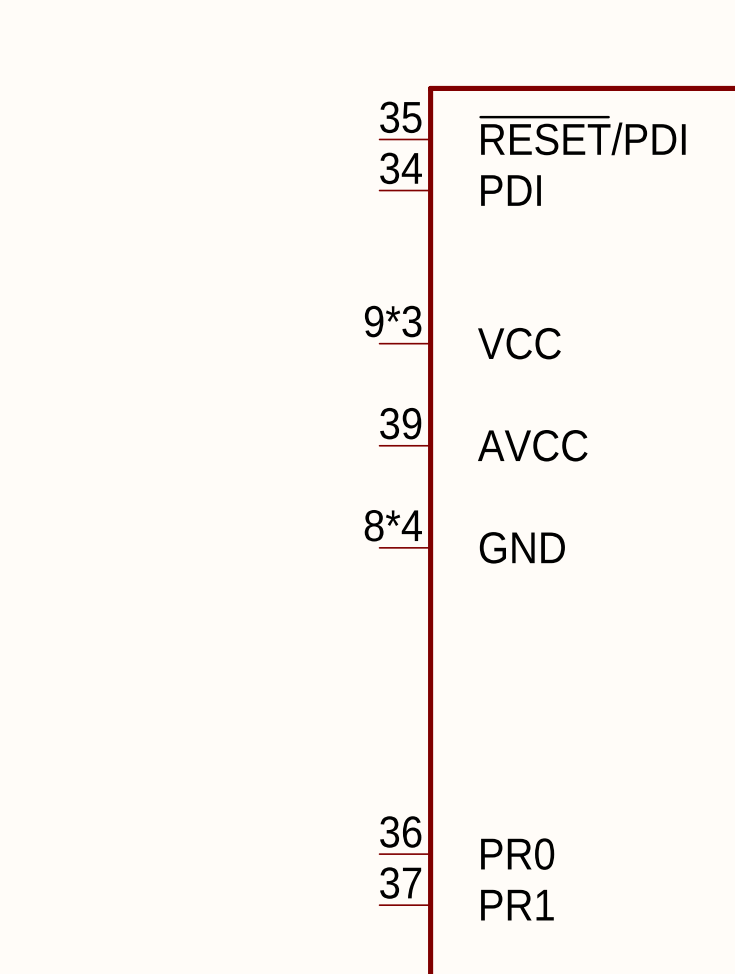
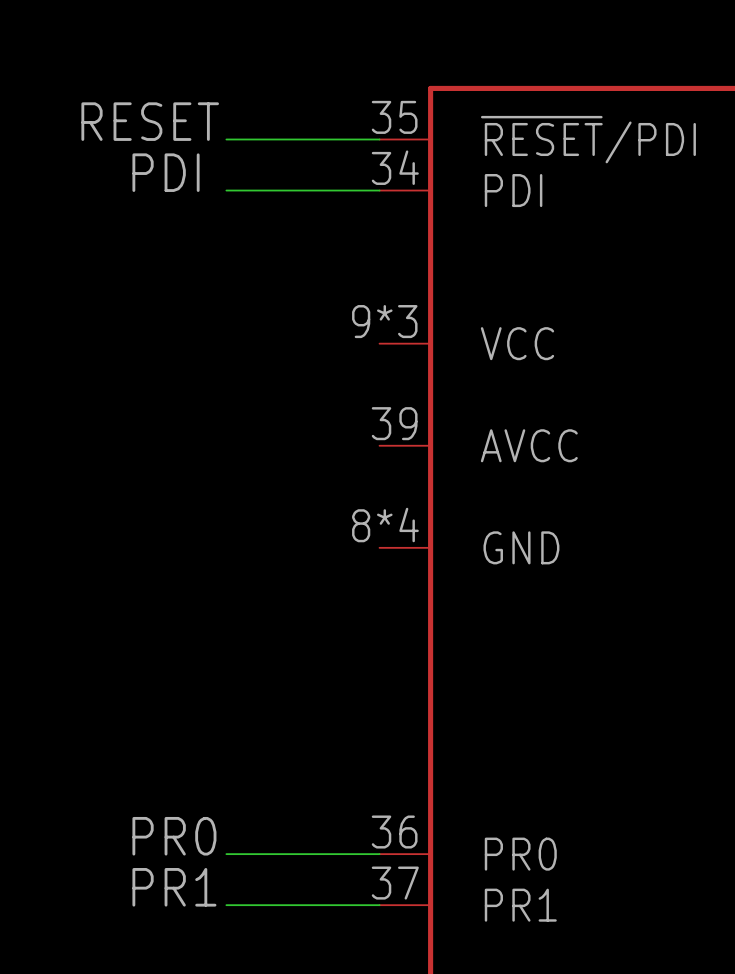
label: none -> RESET (150, 121)
wire: none -> (226, 139) (379, 139)
label: none -> PDI (166, 172)
wire: none -> (226, 190) (379, 190)
label: none -> PR0 (174, 836)
wire: none -> (226, 854) (379, 854)
label: none -> PR1 (174, 887)
wire: none -> (226, 905) (379, 905)

